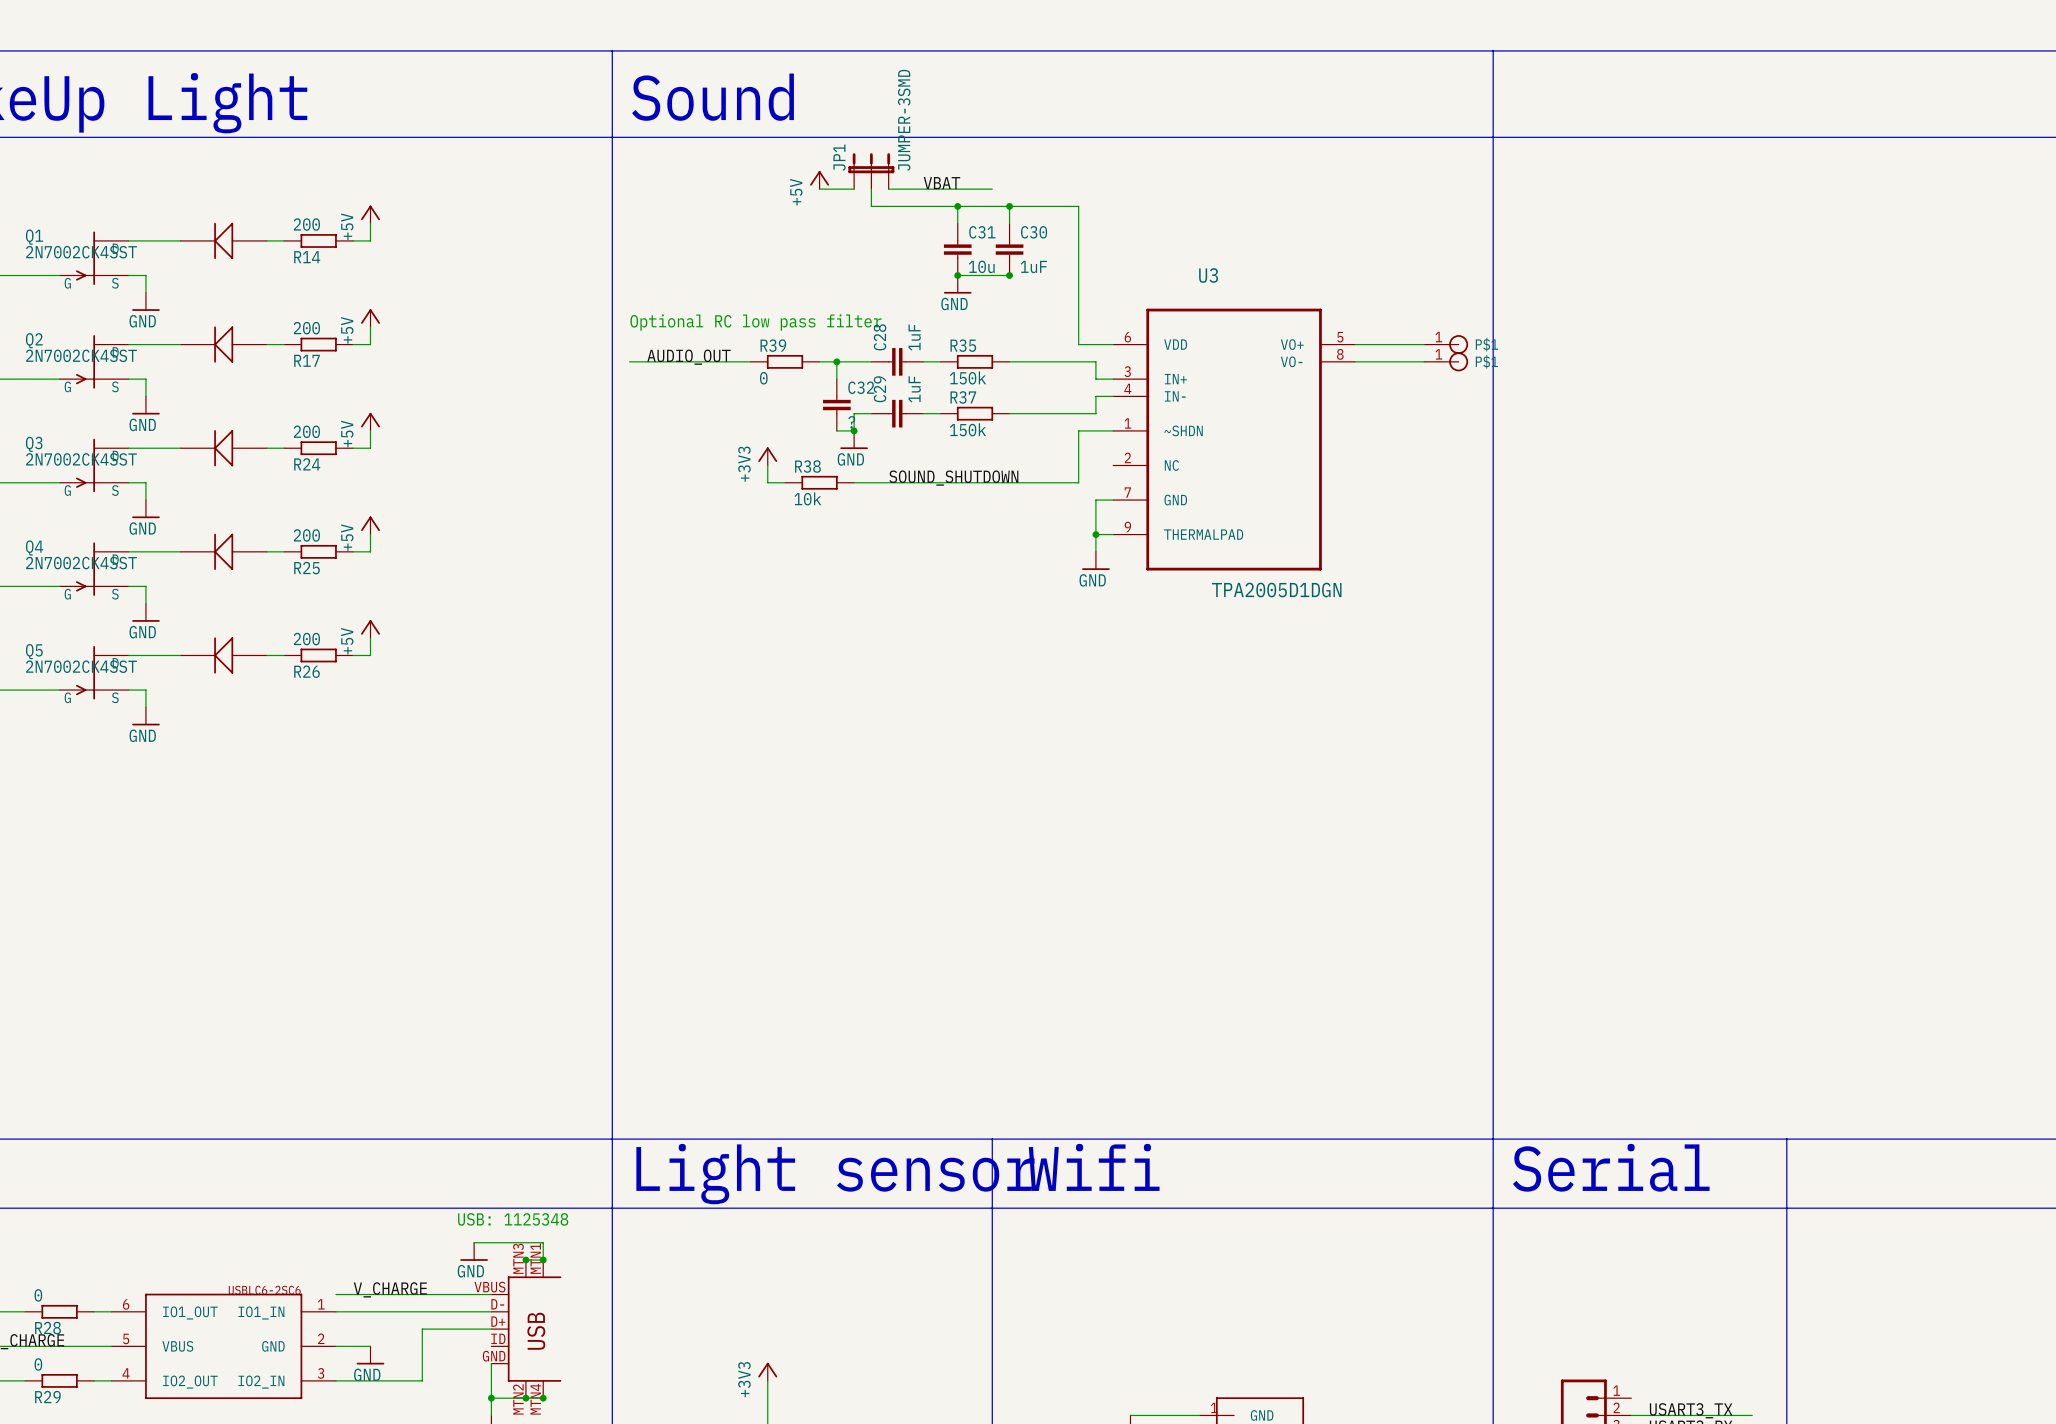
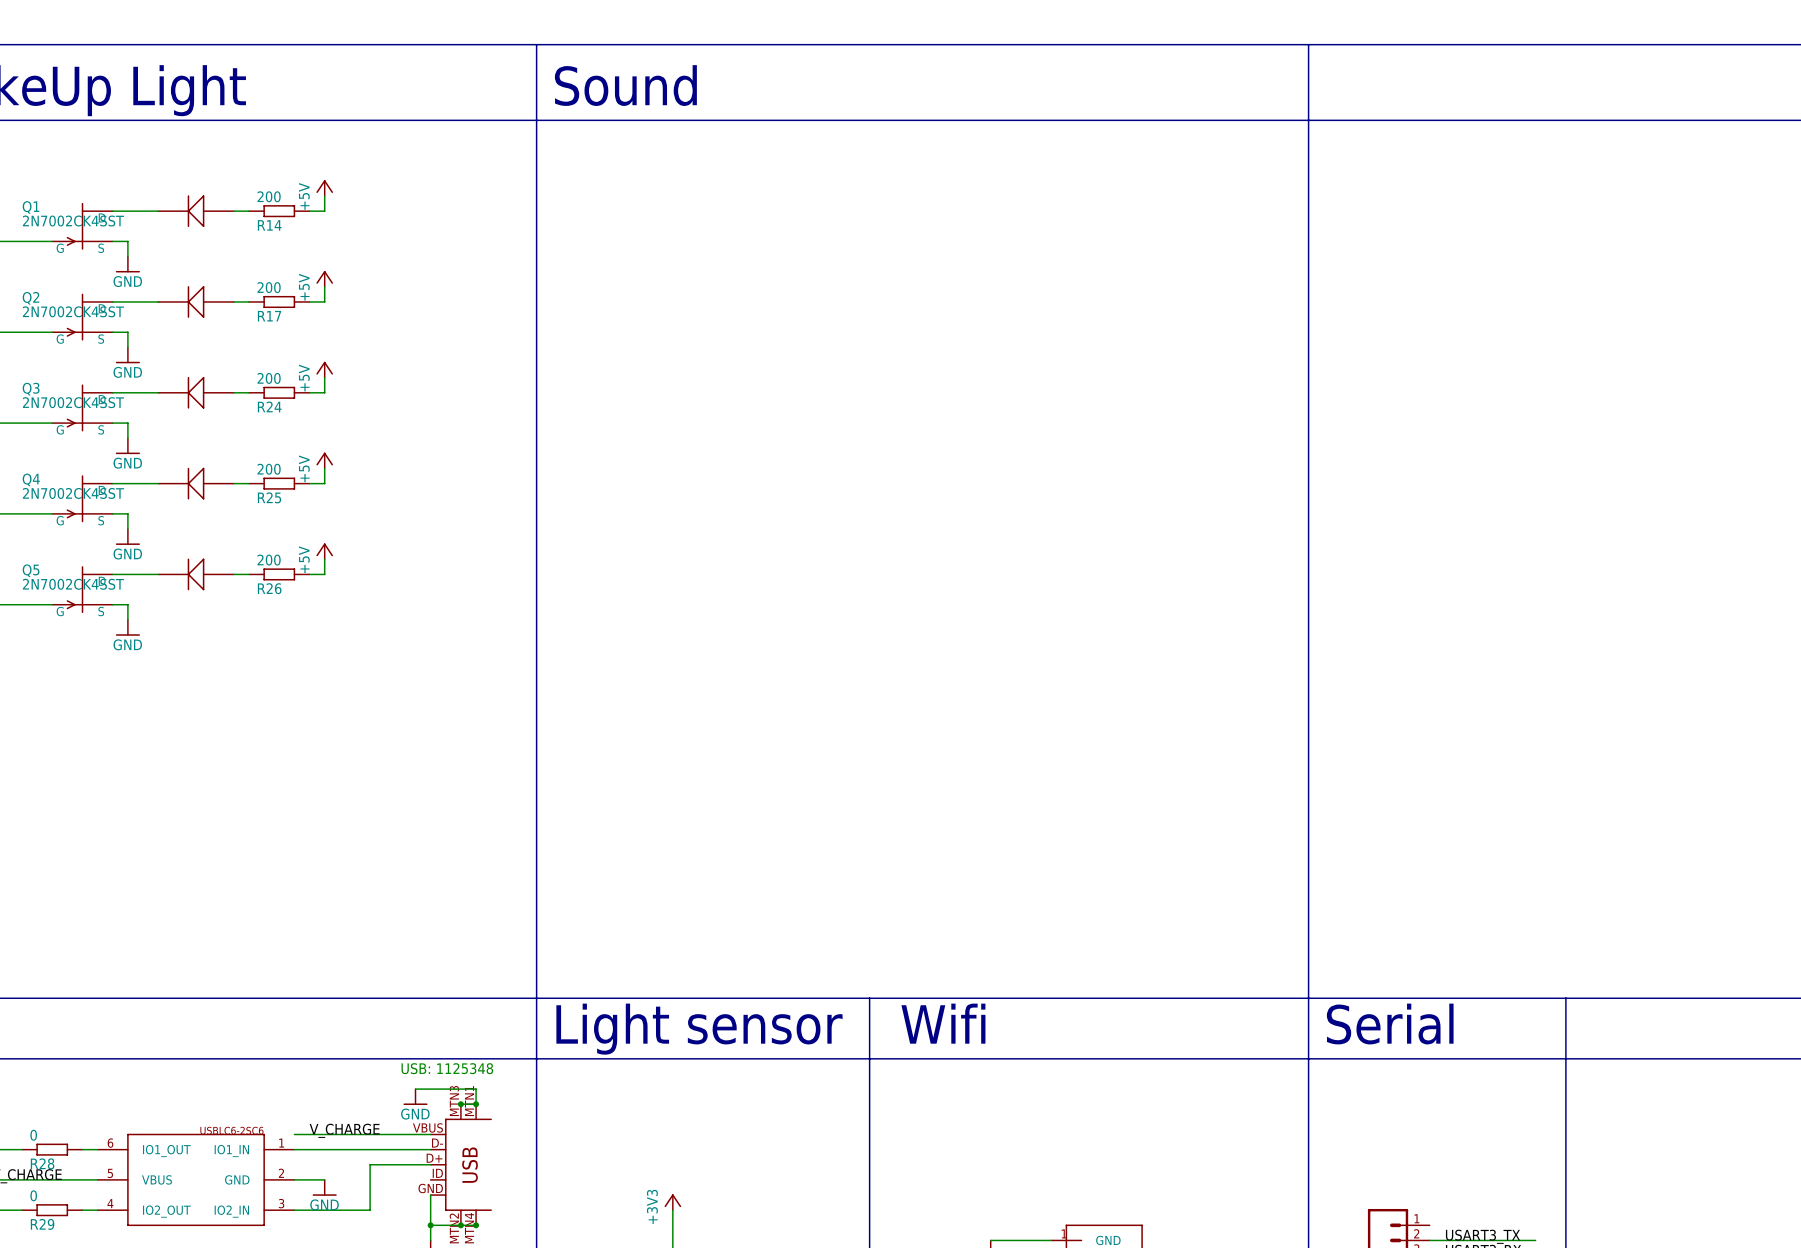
JP1: JUMPER-3SMD (871, 171) -> none
power symbol: +5V (819, 180) -> none
label: VBAT (941, 183) -> none
wire: (819, 189) (854, 189) -> none
wire: (871, 189) (871, 206) (1078, 206) (1078, 344) (1113, 344) -> none
wire: (888, 189) (992, 189) -> none
wire: (957, 206) (957, 223) -> none
junction: (957, 206) -> none
wire: (1009, 206) (1009, 223) -> none
junction: (1009, 206) -> none
C31: 10u (957, 249) -> none
C30: 1uF (1009, 249) -> none
wire: (957, 275) (1009, 275) -> none
junction: (957, 275) -> none
junction: (1009, 275) -> none
power symbol: GND (957, 284) -> none
text: Optional RC low pass filter (755, 322) -> none
wire: (1355, 344) (1424, 344) -> none
part: (1446, 344) -> none
label: AUDIO_OUT (688, 357) -> none
wire: (629, 361) (750, 361) -> none
R39: 0 (785, 361) -> none
wire: (819, 361) (871, 361) -> none
wire: (836, 361) (836, 379) -> none
junction: (836, 361) -> none
C28: 1uF (897, 361) -> none
wire: (923, 361) (940, 361) -> none
R35: 150k (975, 361) -> none
wire: (1009, 361) (1095, 361) (1095, 379) (1113, 379) -> none
wire: (1355, 361) (1424, 361) -> none
part: (1446, 361) -> none
wire: (1113, 396) (1095, 396) (1095, 413) (1009, 413) -> none
C32: ? (836, 405) -> none
wire: (871, 413) (854, 413) (854, 430) (836, 430) -> none
C29: 1uF (897, 413) -> none
wire: (923, 413) (940, 413) -> none
R37: 150k (975, 413) -> none
junction: (854, 430) -> none
wire: (1113, 430) (1078, 430) (1078, 482) (854, 482) -> none
U3: TPA2005D1DGN (1234, 439) -> none
power symbol: GND (854, 440) -> none
power symbol: +3V3 (767, 456) -> none
wire: (767, 465) (767, 482) (785, 482) -> none
label: SOUND_SHUTDOWN (953, 478) -> none
R38: 10k (819, 482) -> none
wire: (1113, 500) (1095, 500) (1095, 551) -> none
wire: (1095, 534) (1113, 534) -> none
junction: (1095, 534) -> none
power symbol: GND (1095, 560) -> none

